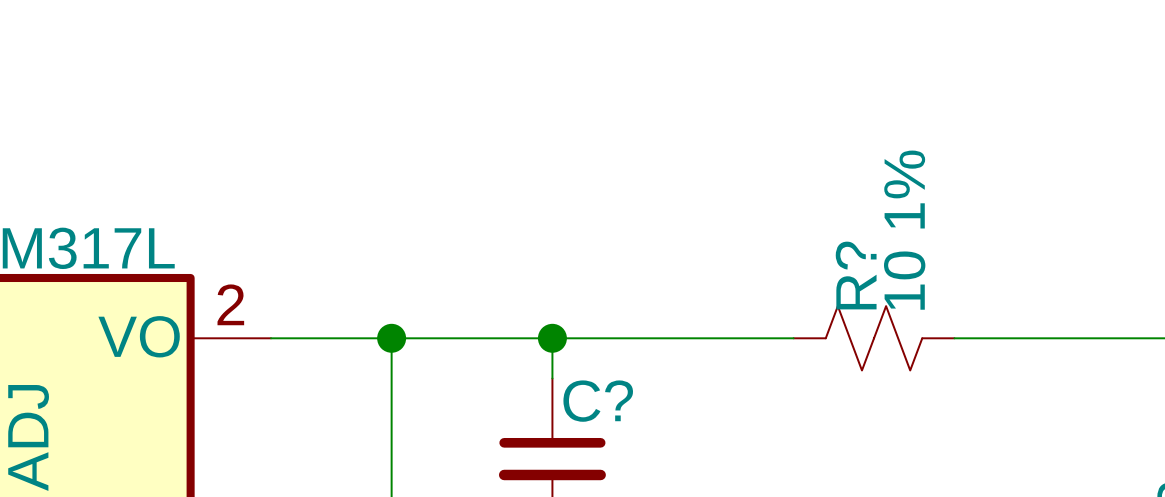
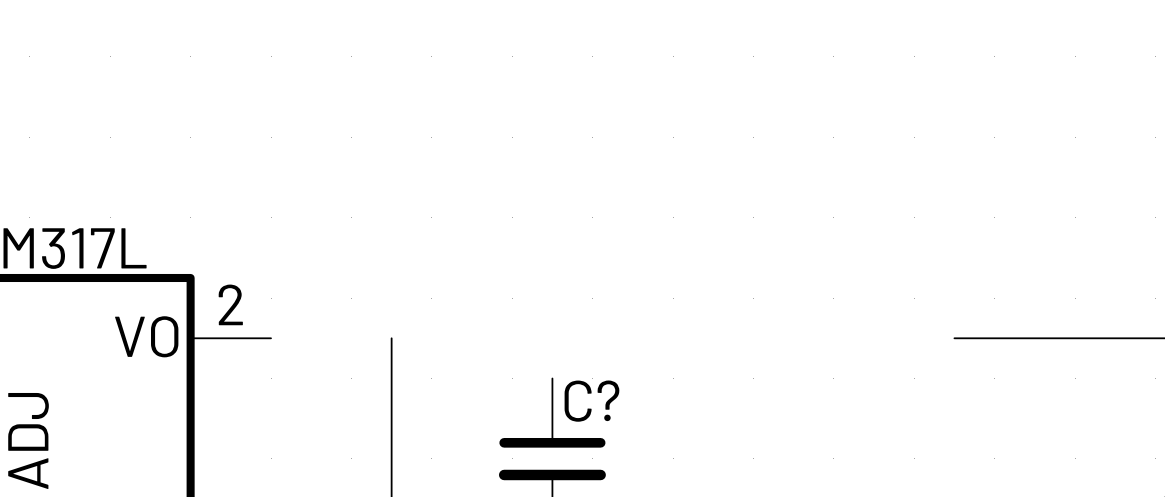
wire: (271, 338) (793, 338) -> none
junction: (391, 338) -> none
wire: (552, 338) (552, 378) -> none
junction: (552, 338) -> none
R?: 10 1% (874, 338) -> none

